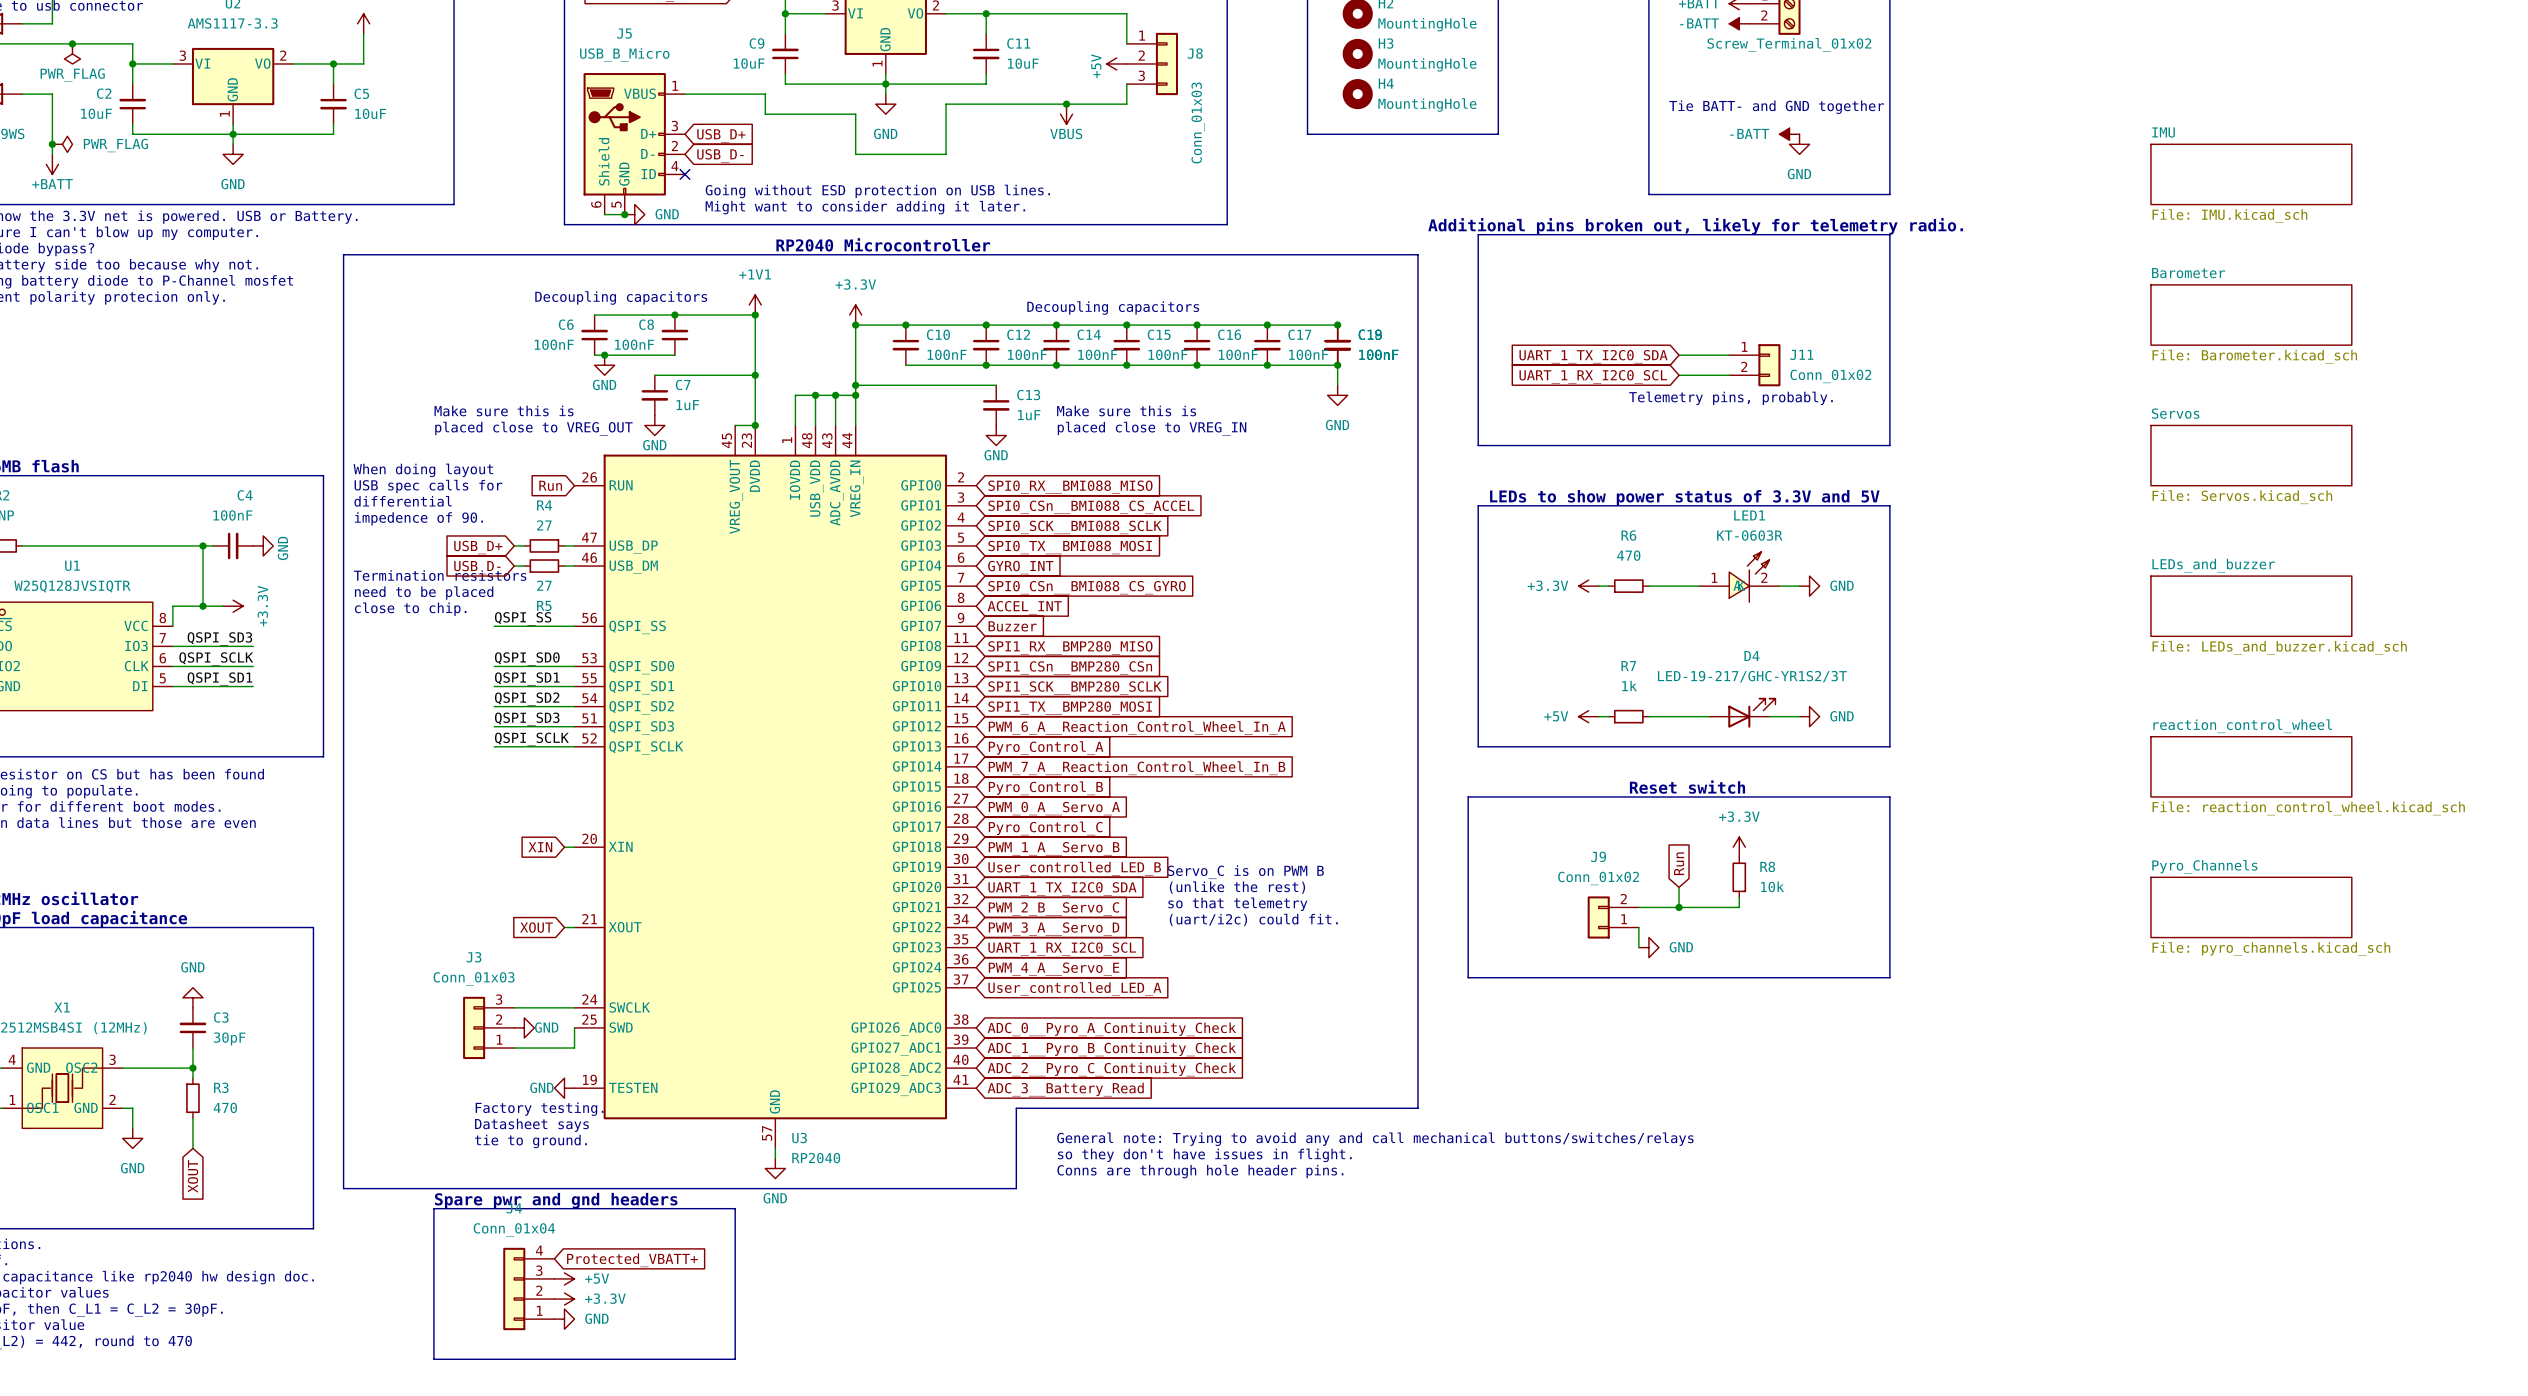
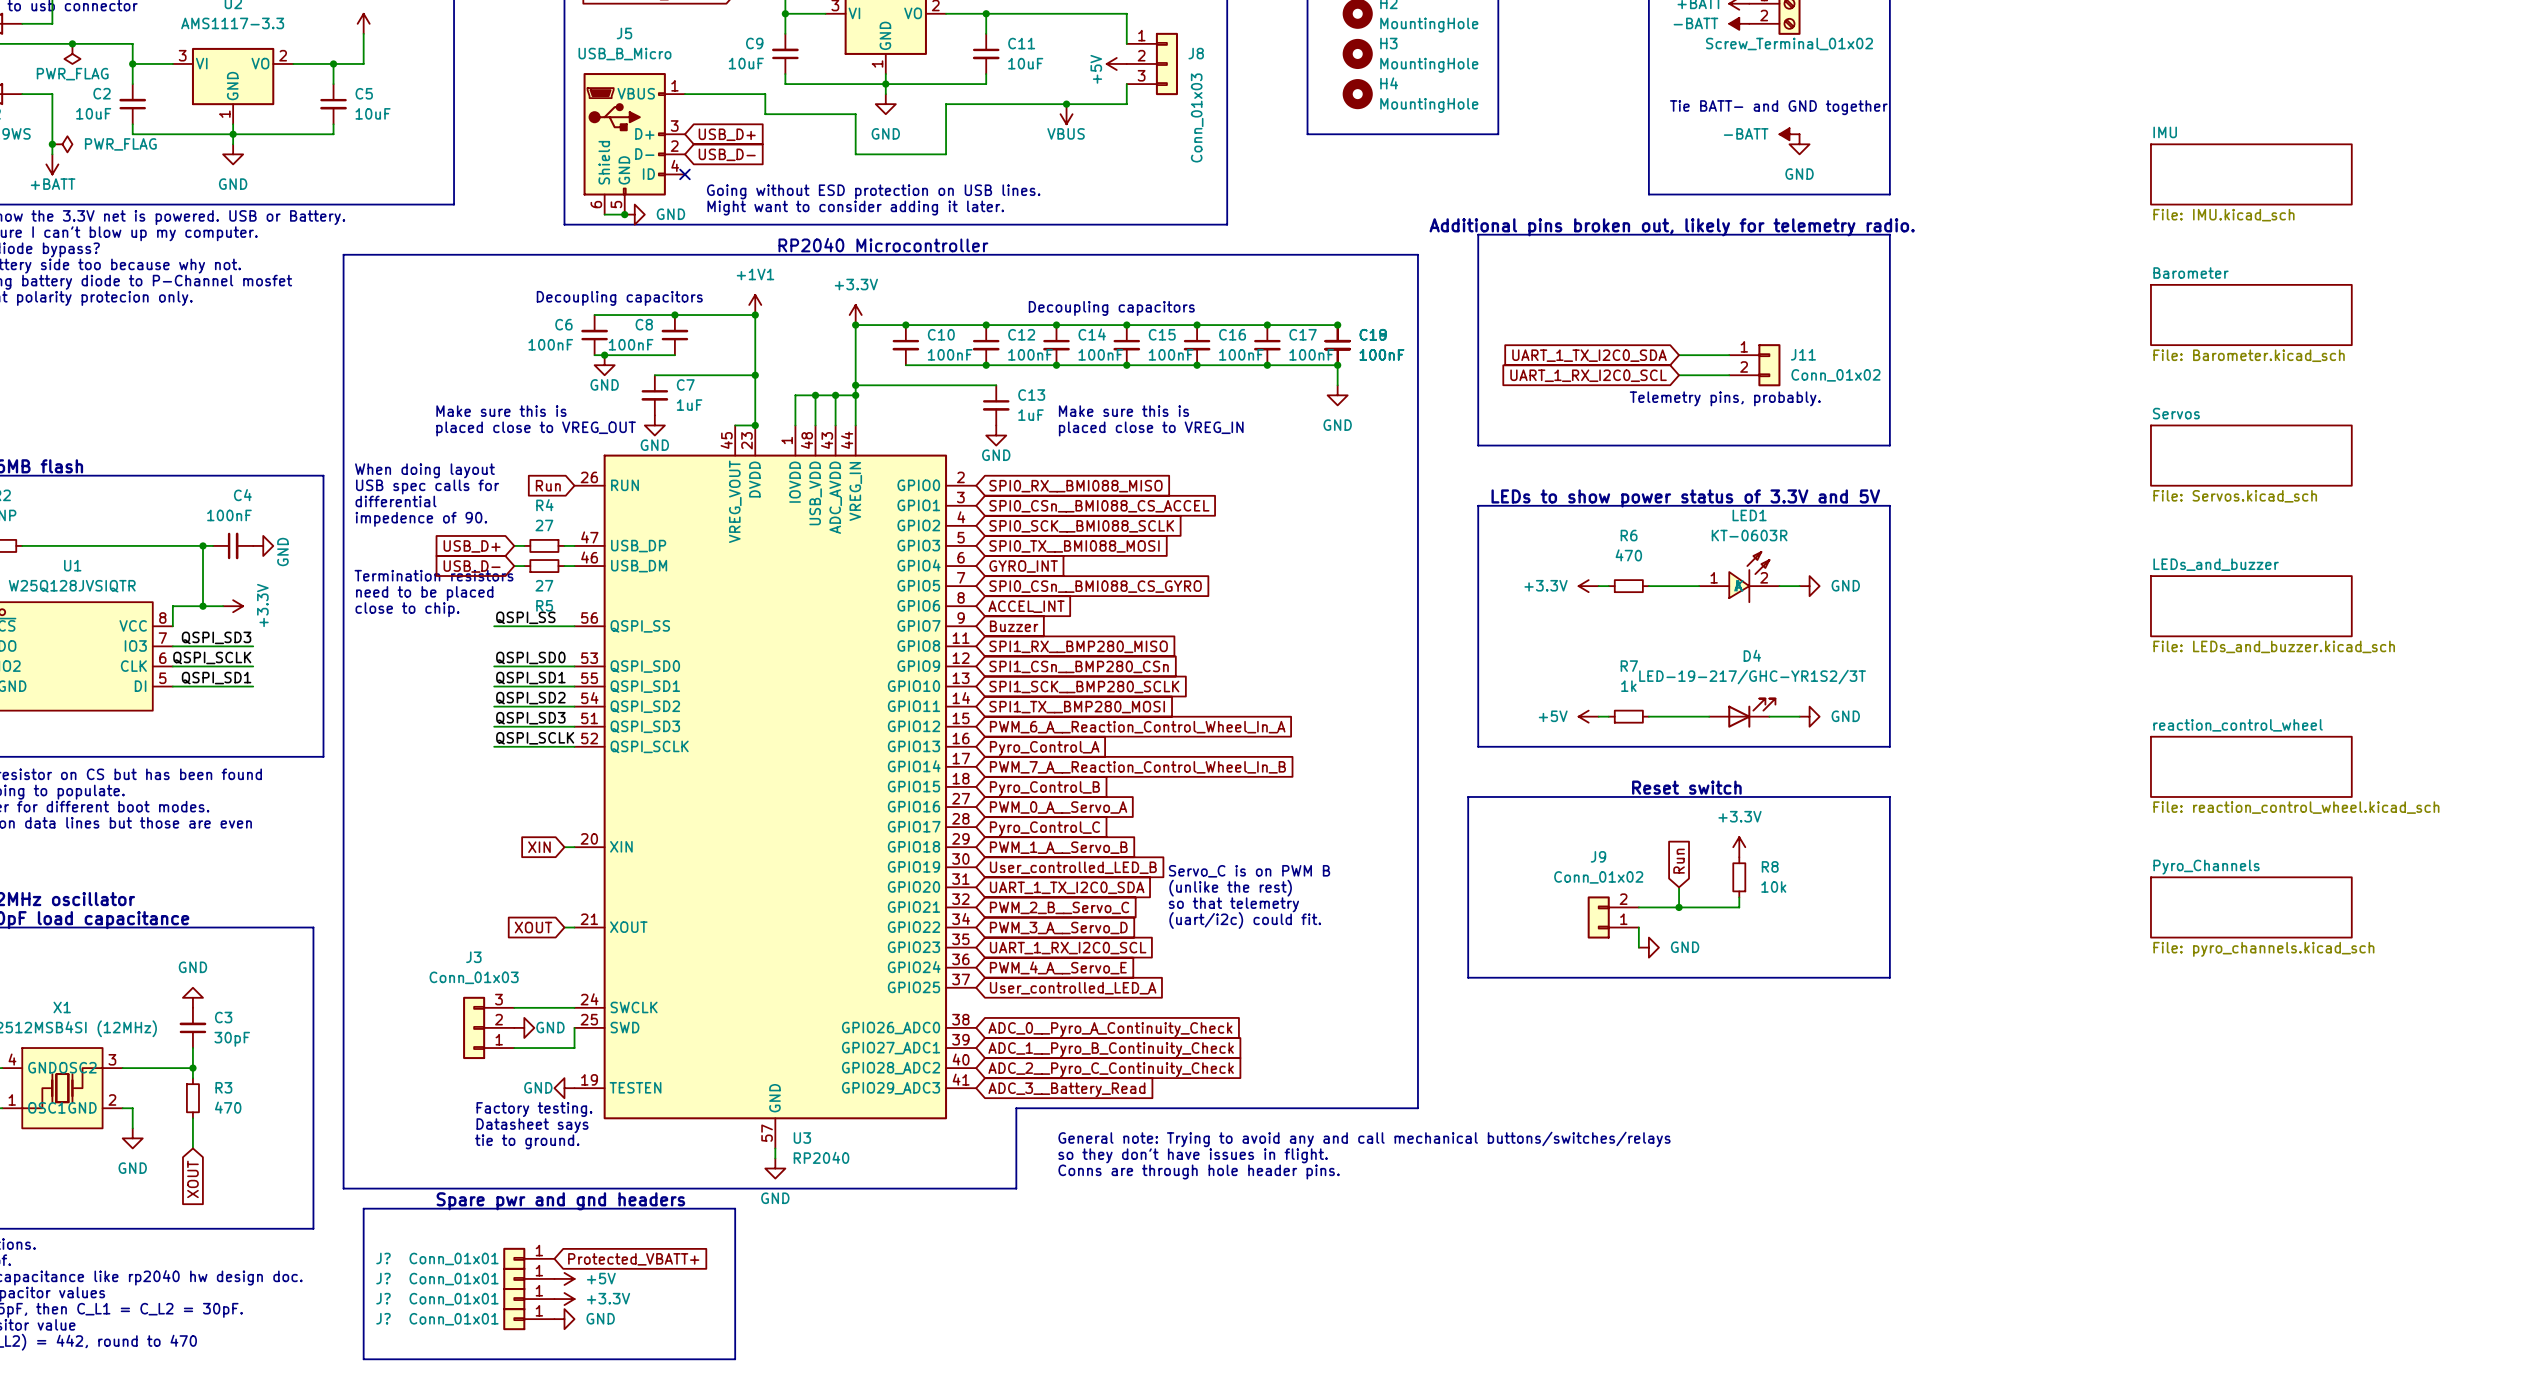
line: (433, 1208) (433, 1359) -> (433, 1208) (363, 1208) (363, 1359) (433, 1359)
J?: none -> Conn_01x01 (528, 1258)
J?: none -> Conn_01x01 (528, 1278)
J4: Conn_01x04 (528, 1289) -> none
J?: none -> Conn_01x01 (528, 1299)
J?: none -> Conn_01x01 (528, 1319)

